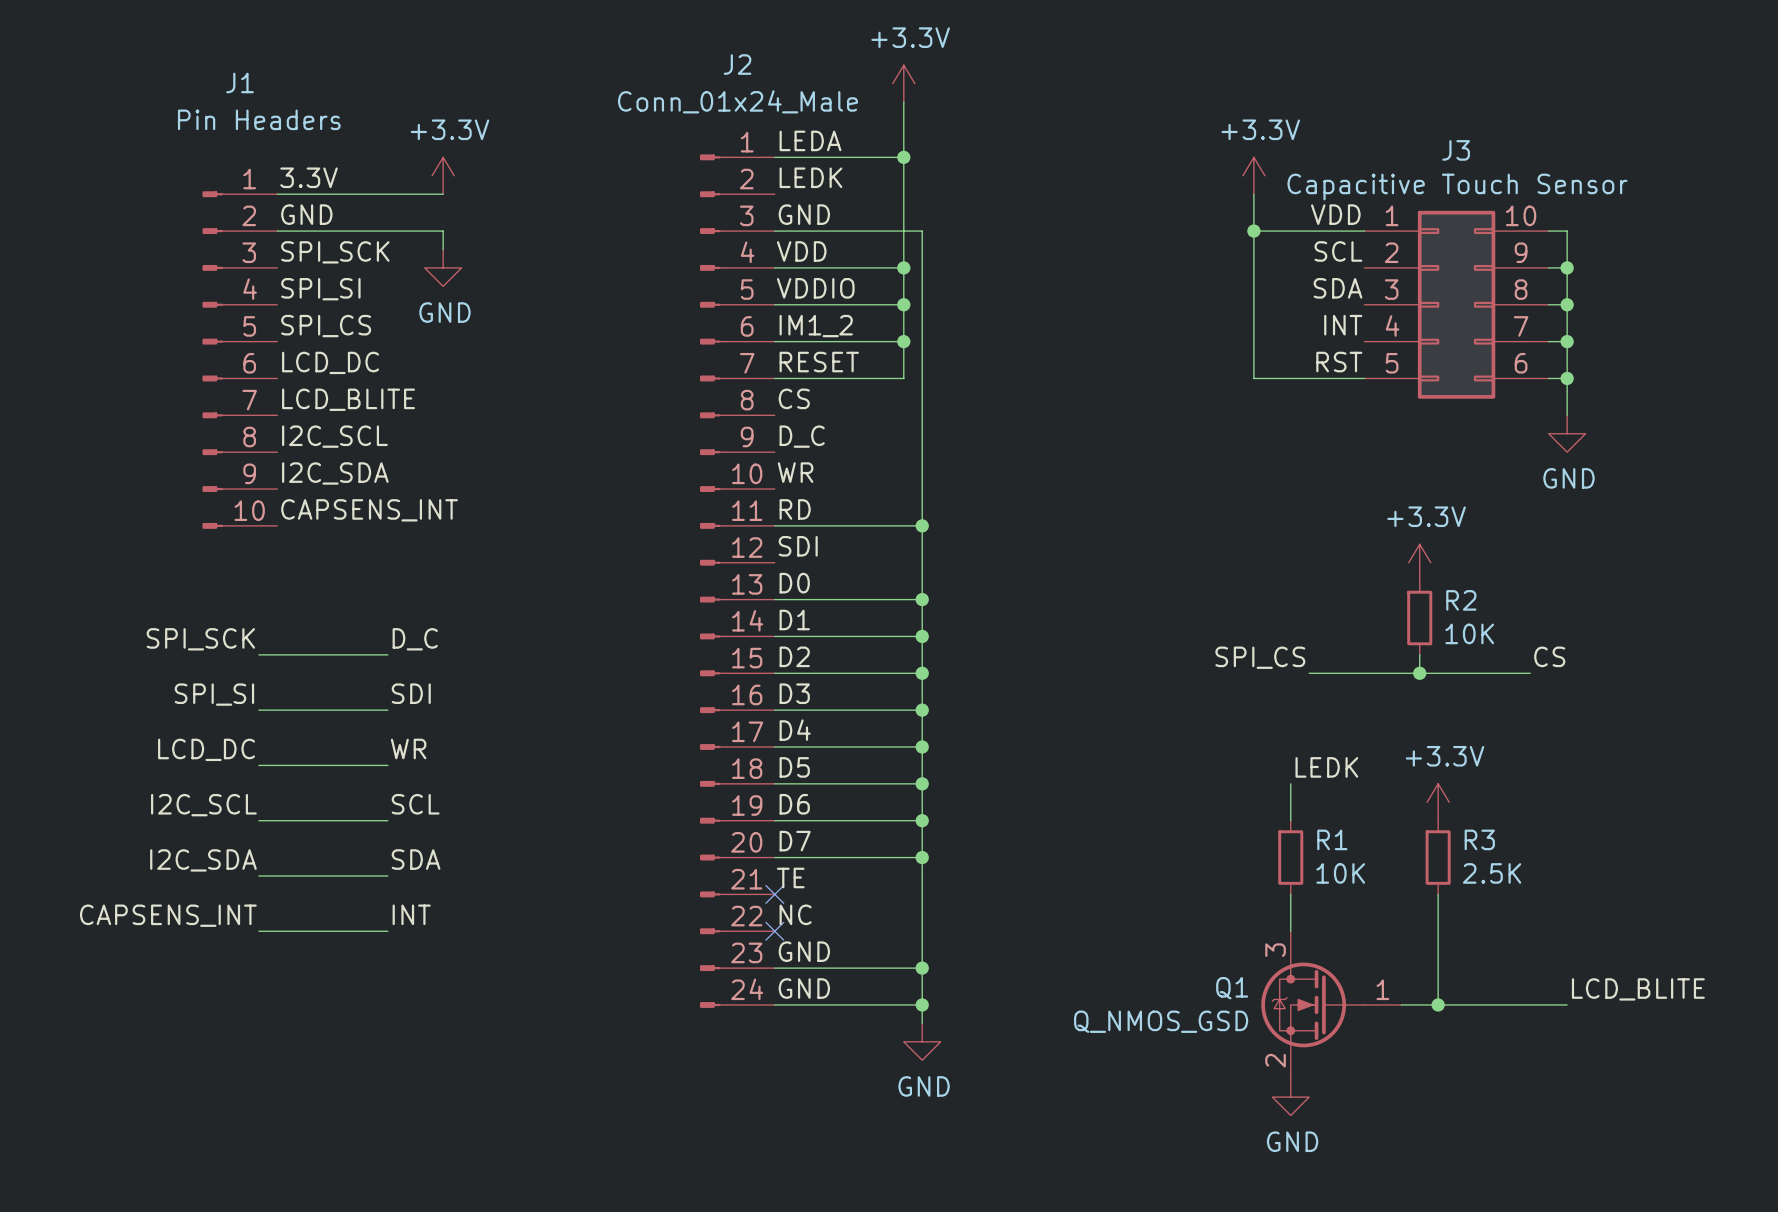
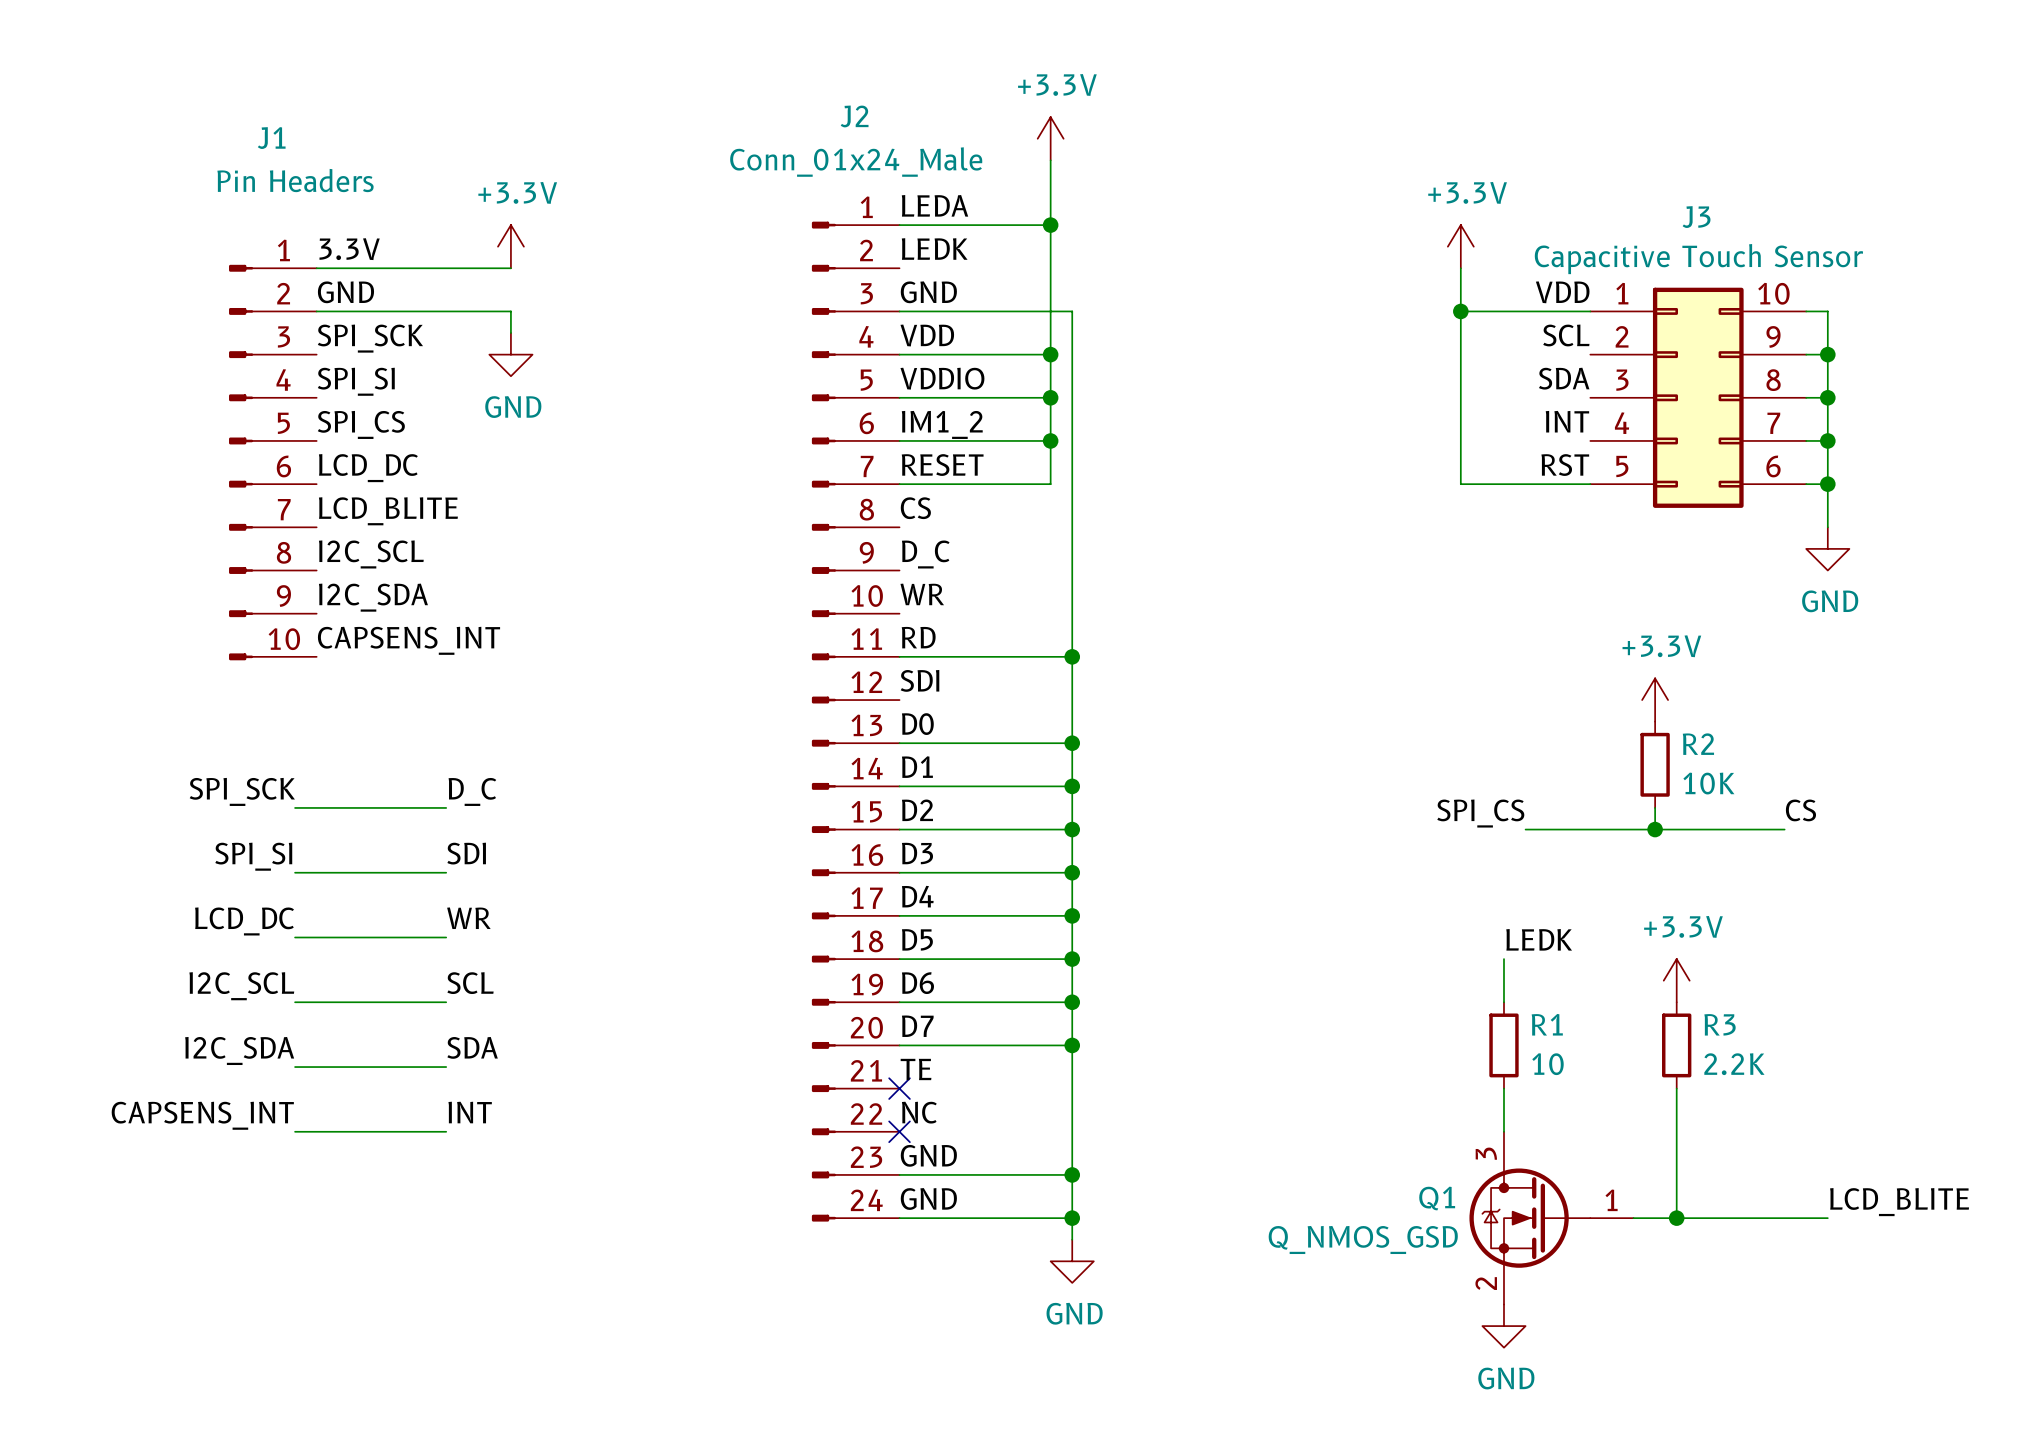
R1 value: 10K (1340, 873) -> 10 (1547, 1064)
R3 value: 2.5K (1492, 873) -> 2.2K (1734, 1064)

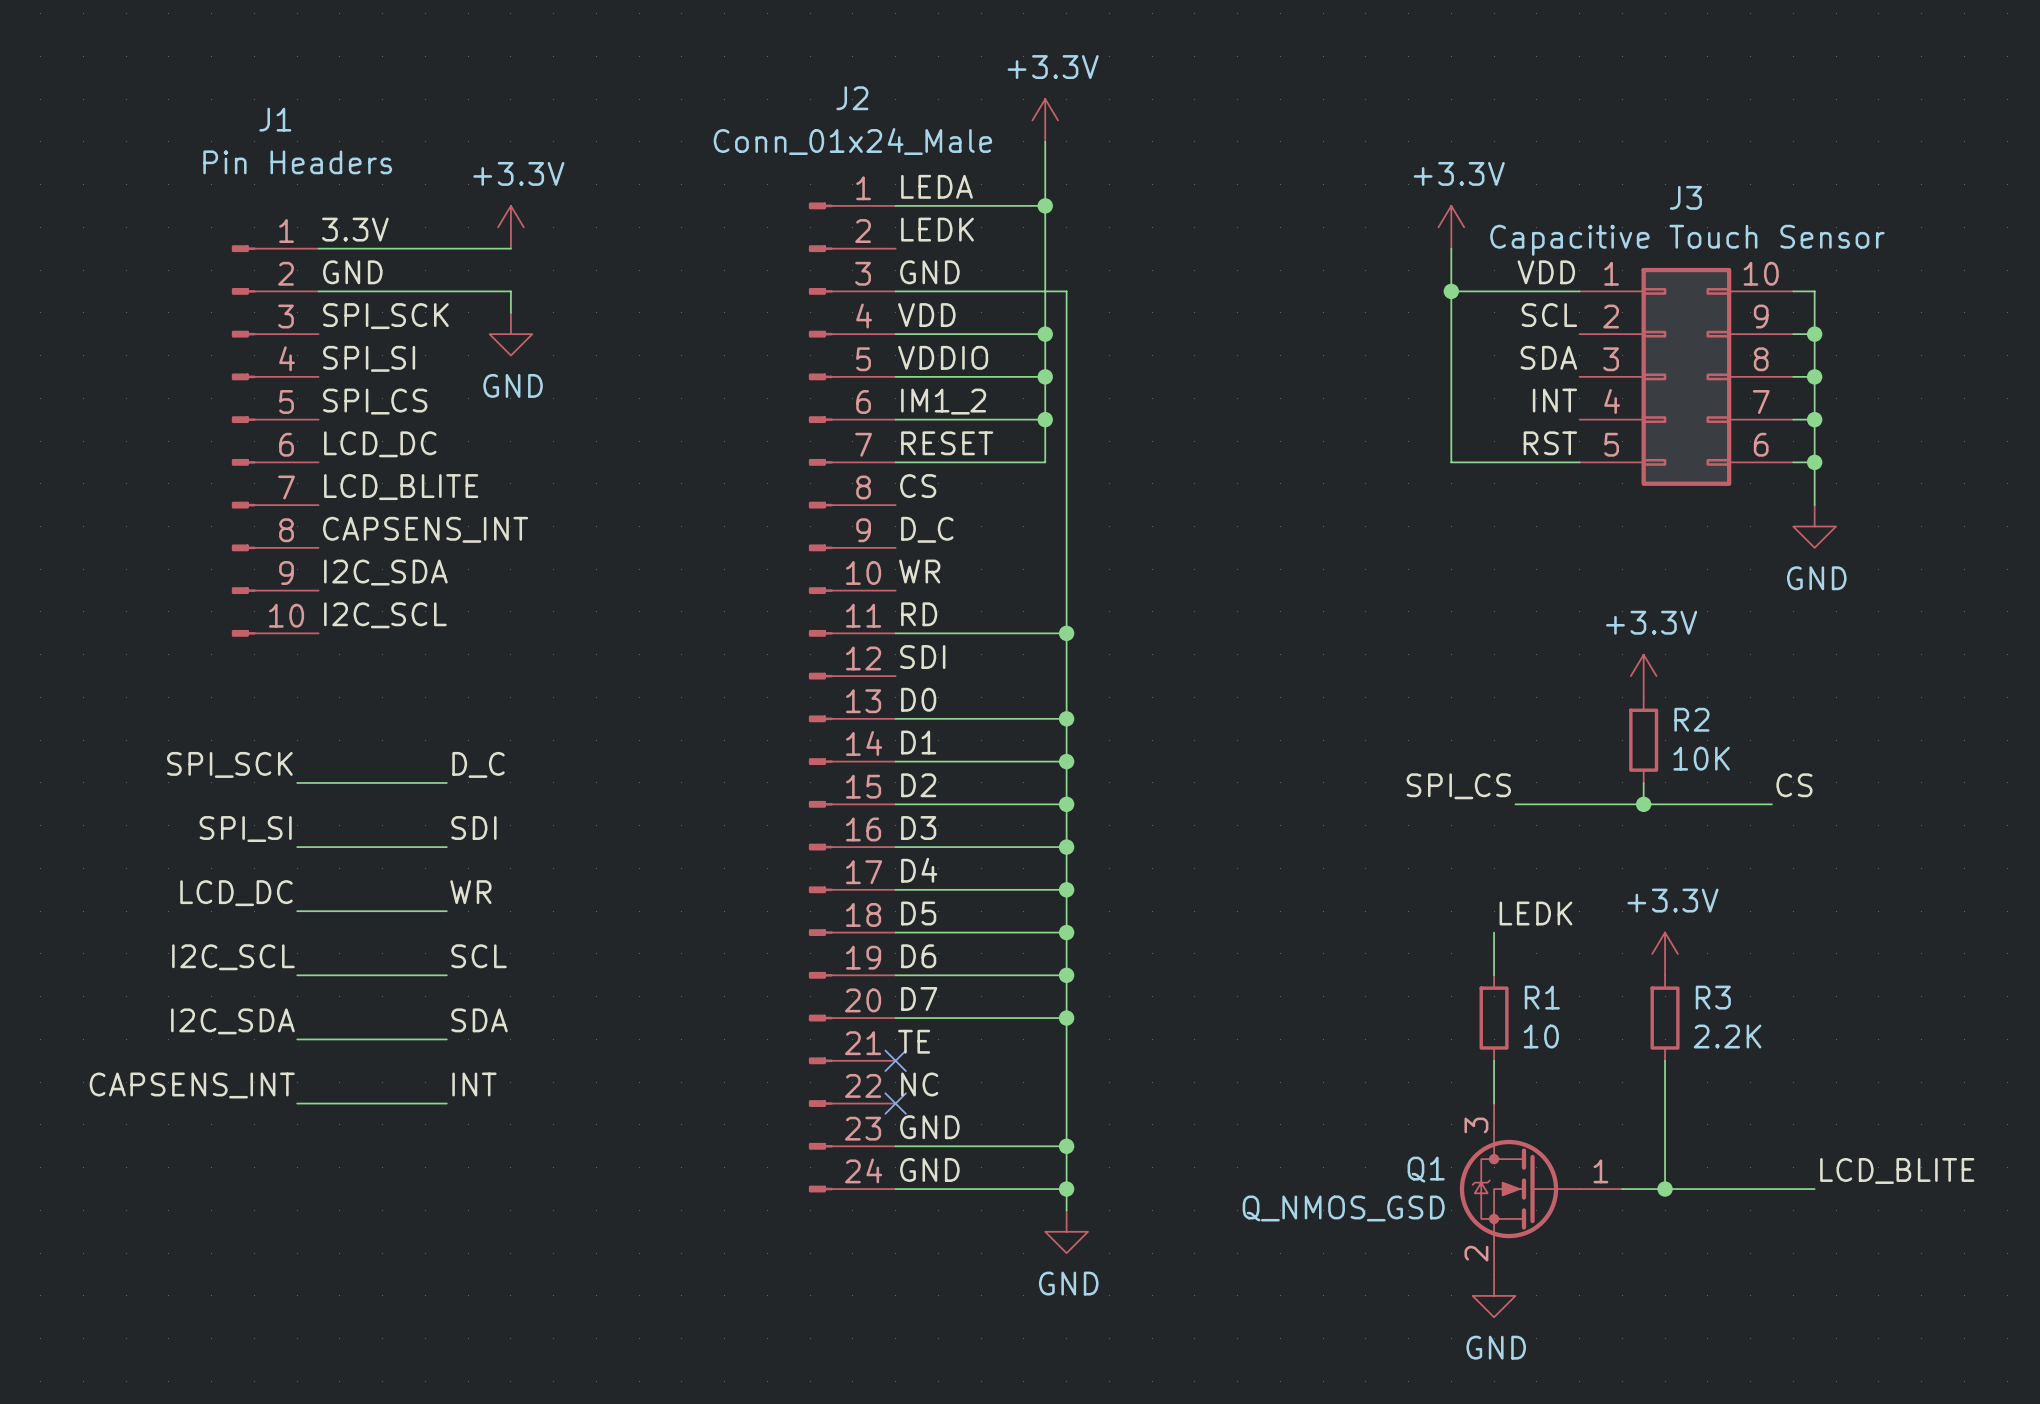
label: I2C_SCL (371, 554) -> CAPSENS_INT (425, 529)
label: CAPSENS_INT (409, 640) -> I2C_SCL (385, 615)

